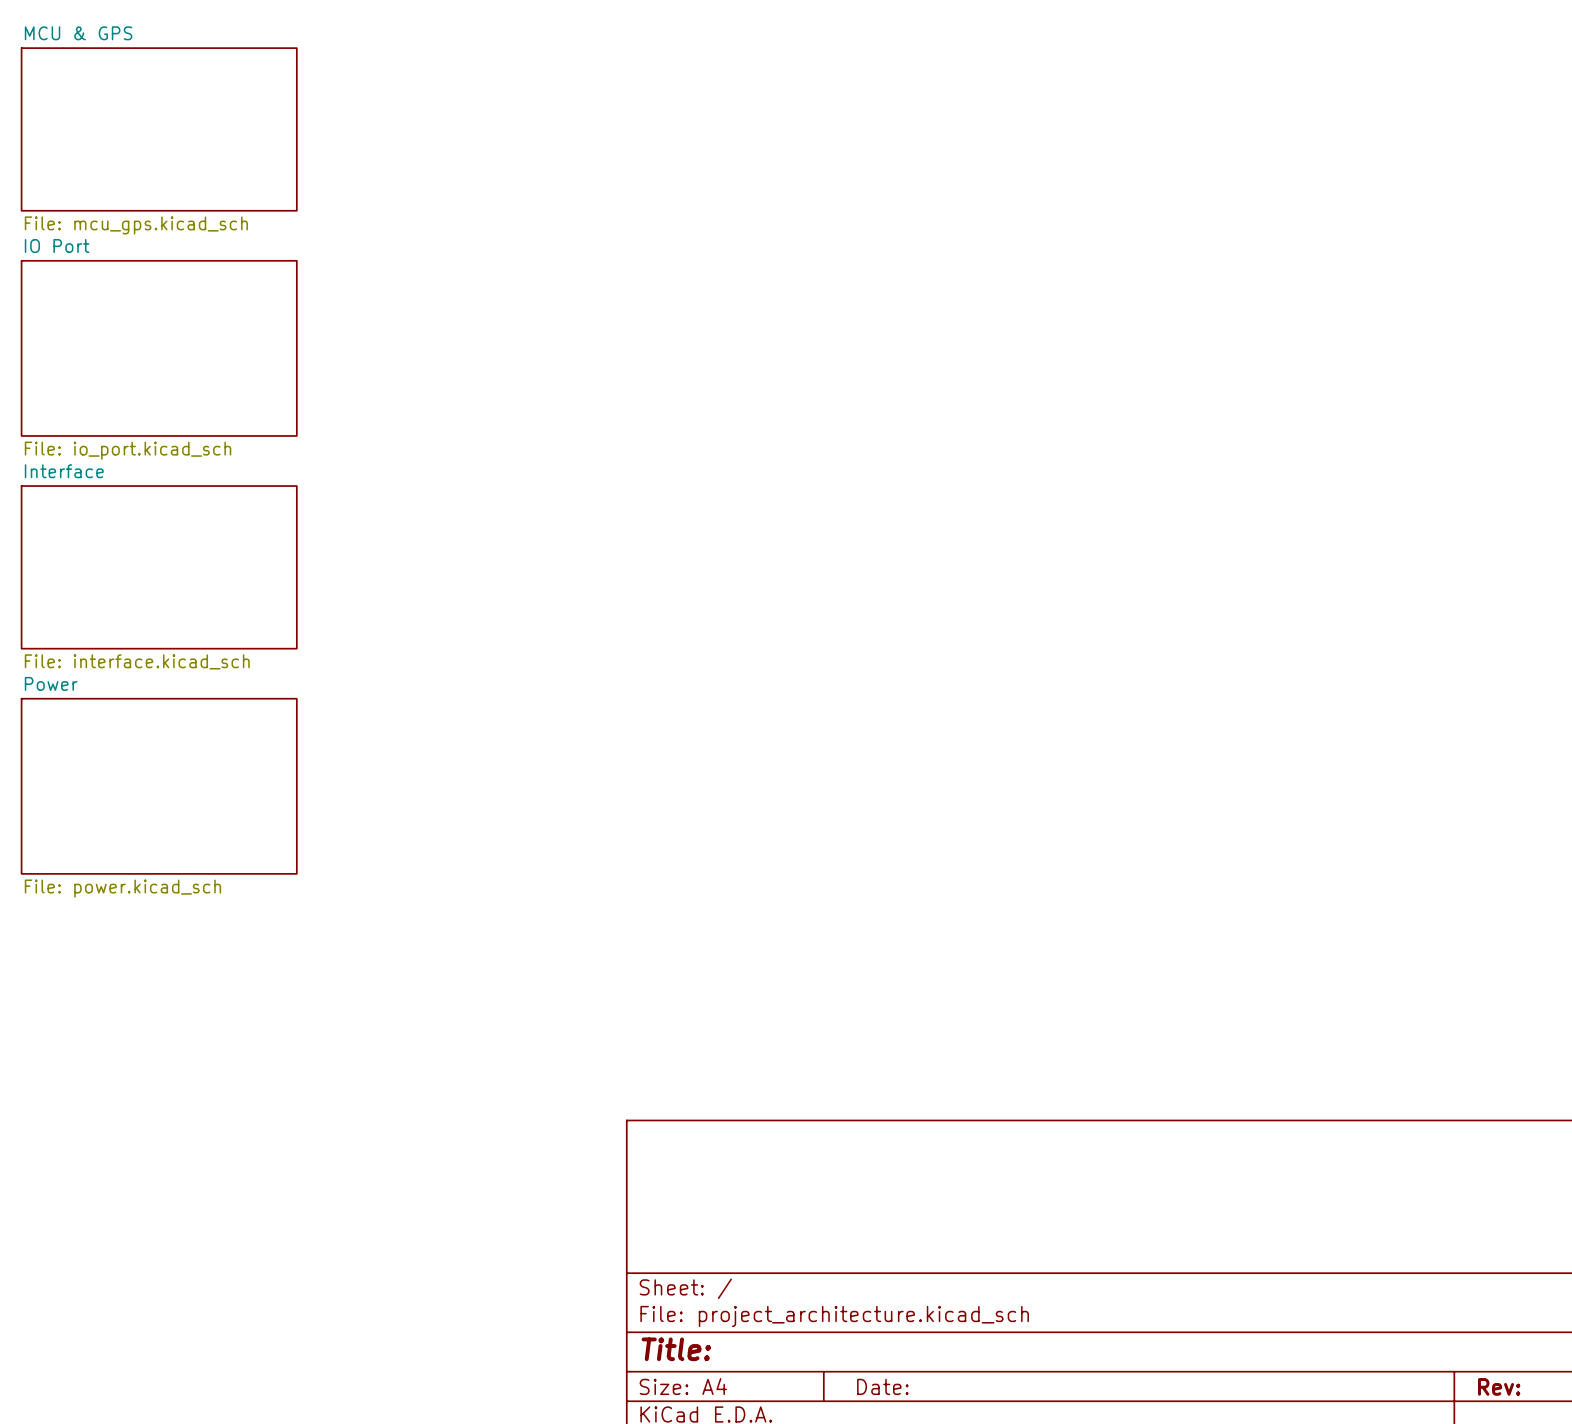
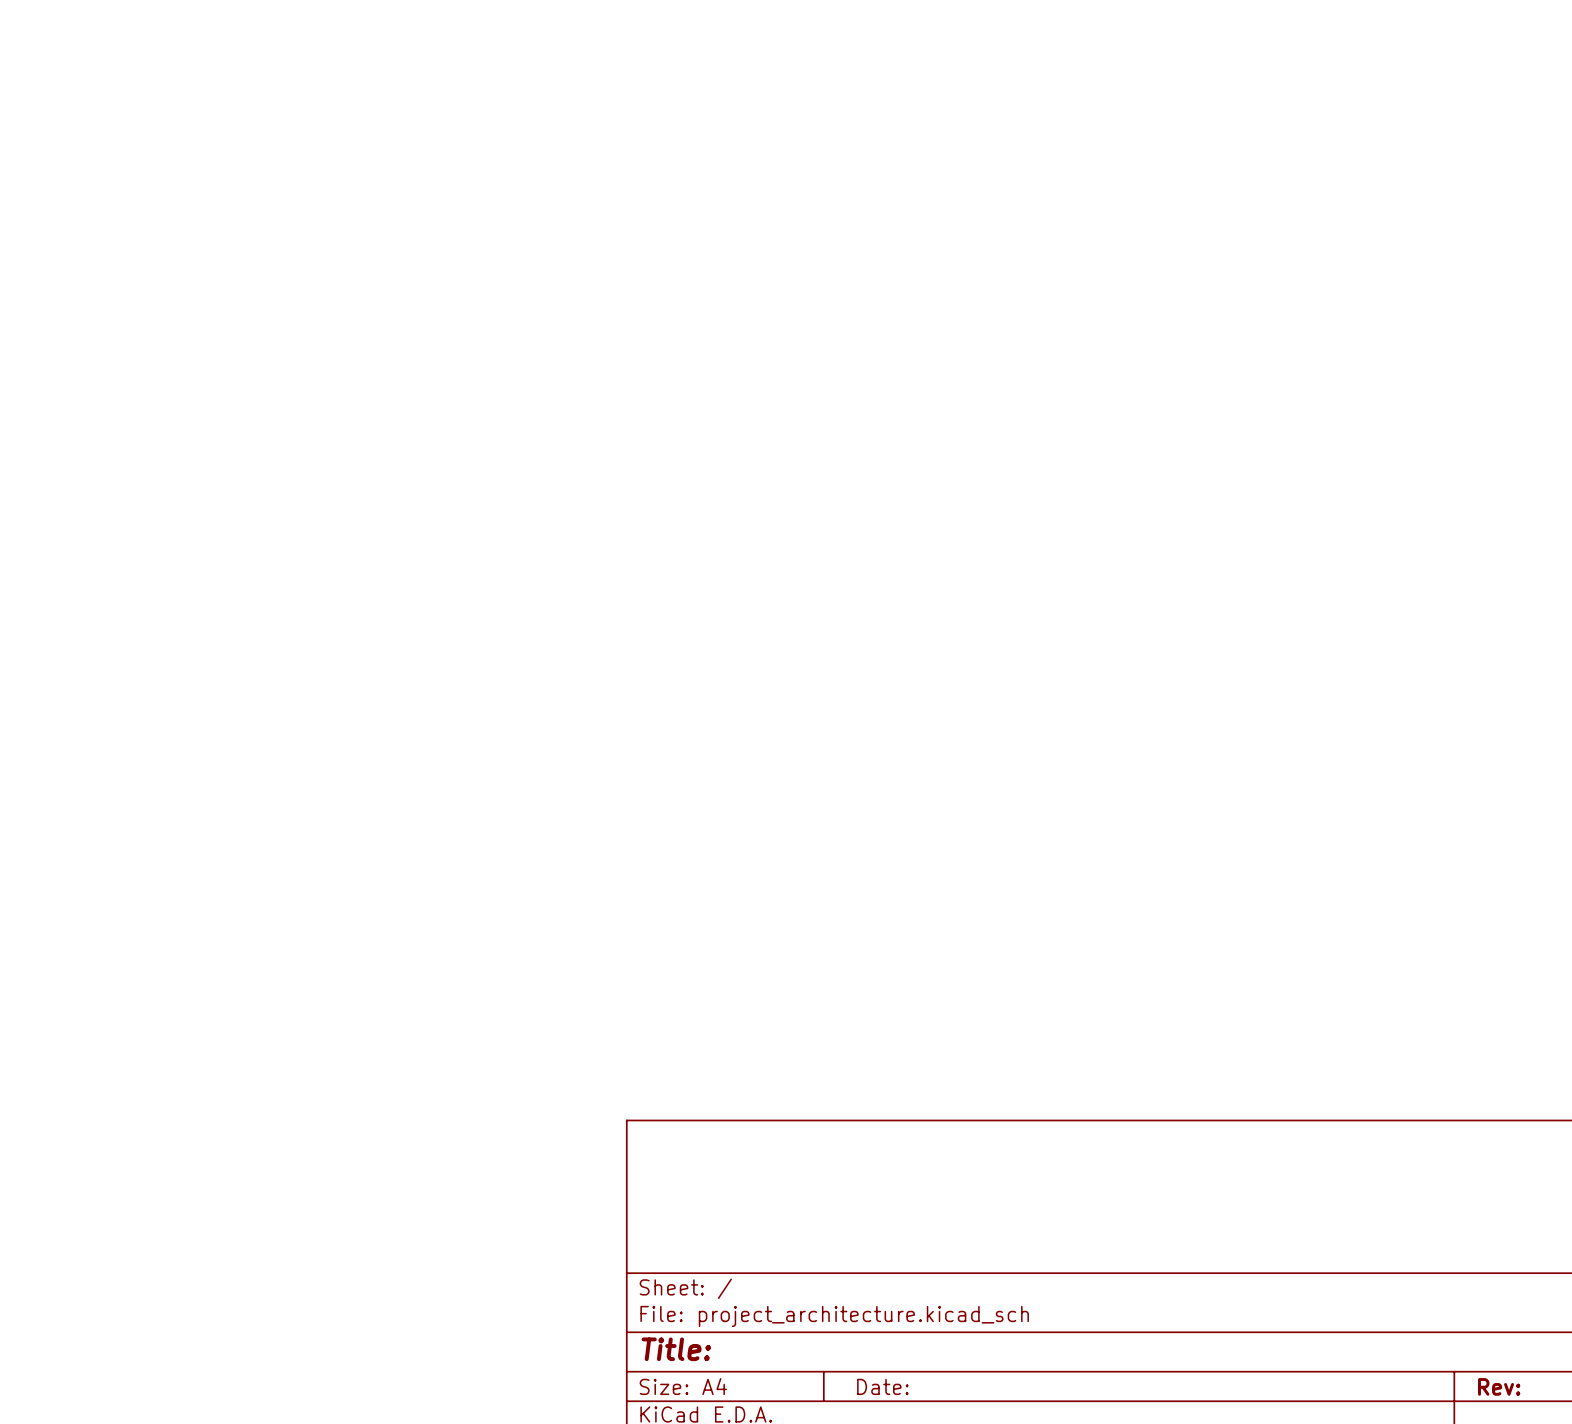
sheet MCU & GPS: File: mcu_gps.kicad_sch (159, 129) -> none
sheet IO Port: File: io_port.kicad_sch (159, 348) -> none
sheet Interface: File: interface.kicad_sch (159, 567) -> none
sheet Power: File: power.kicad_sch (159, 786) -> none

